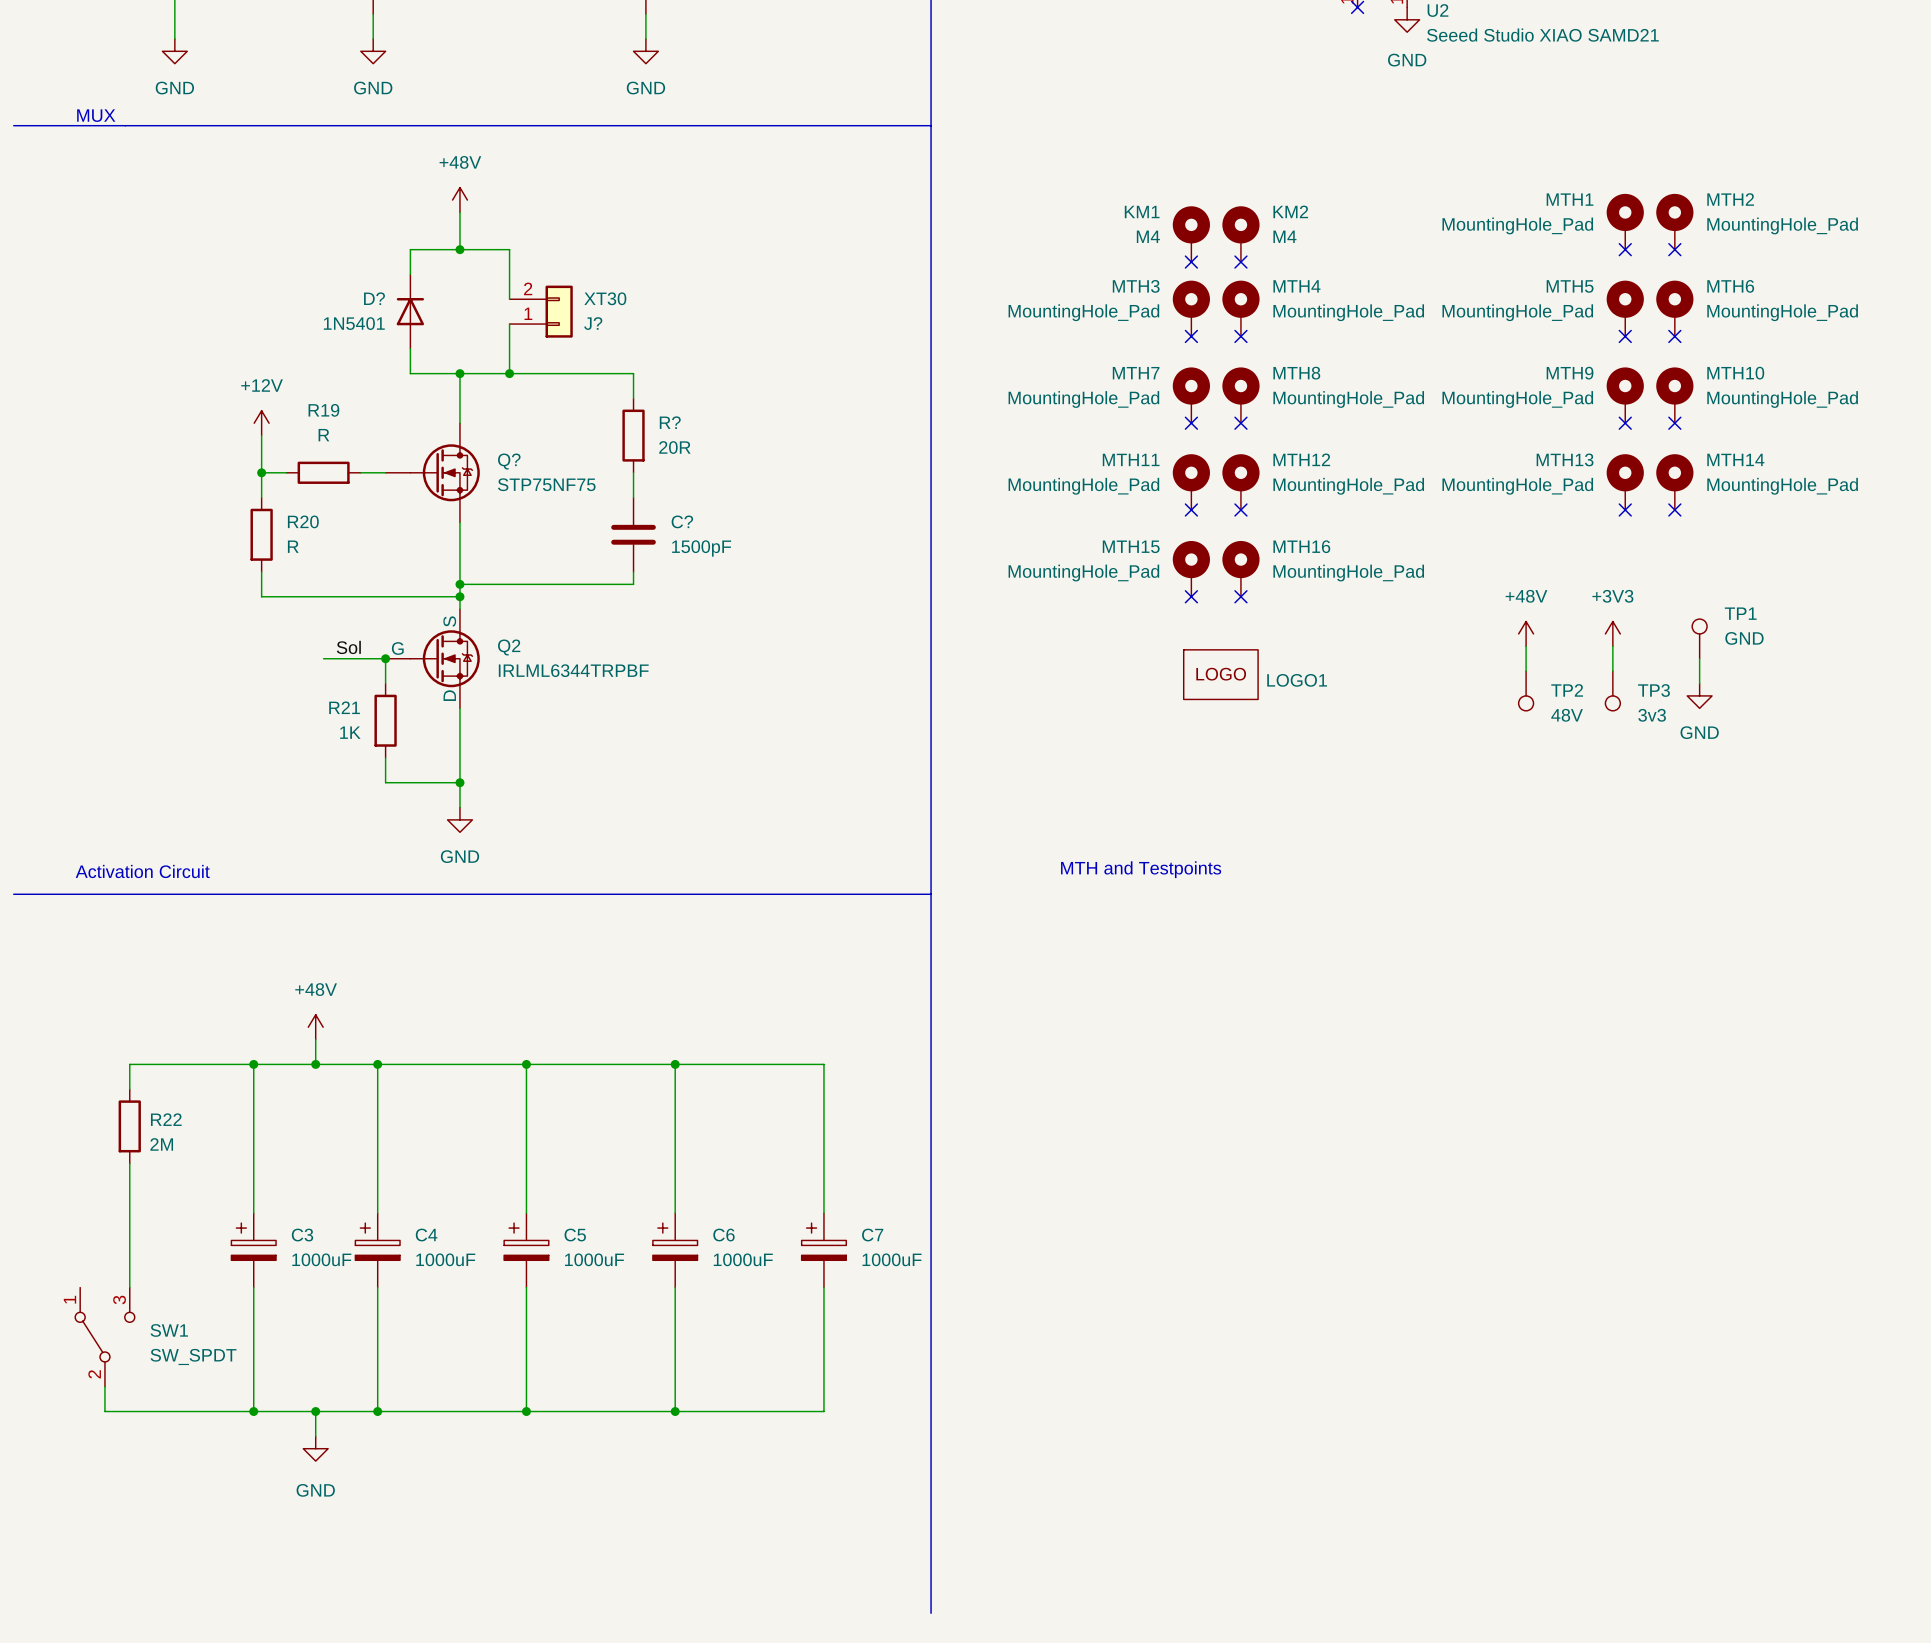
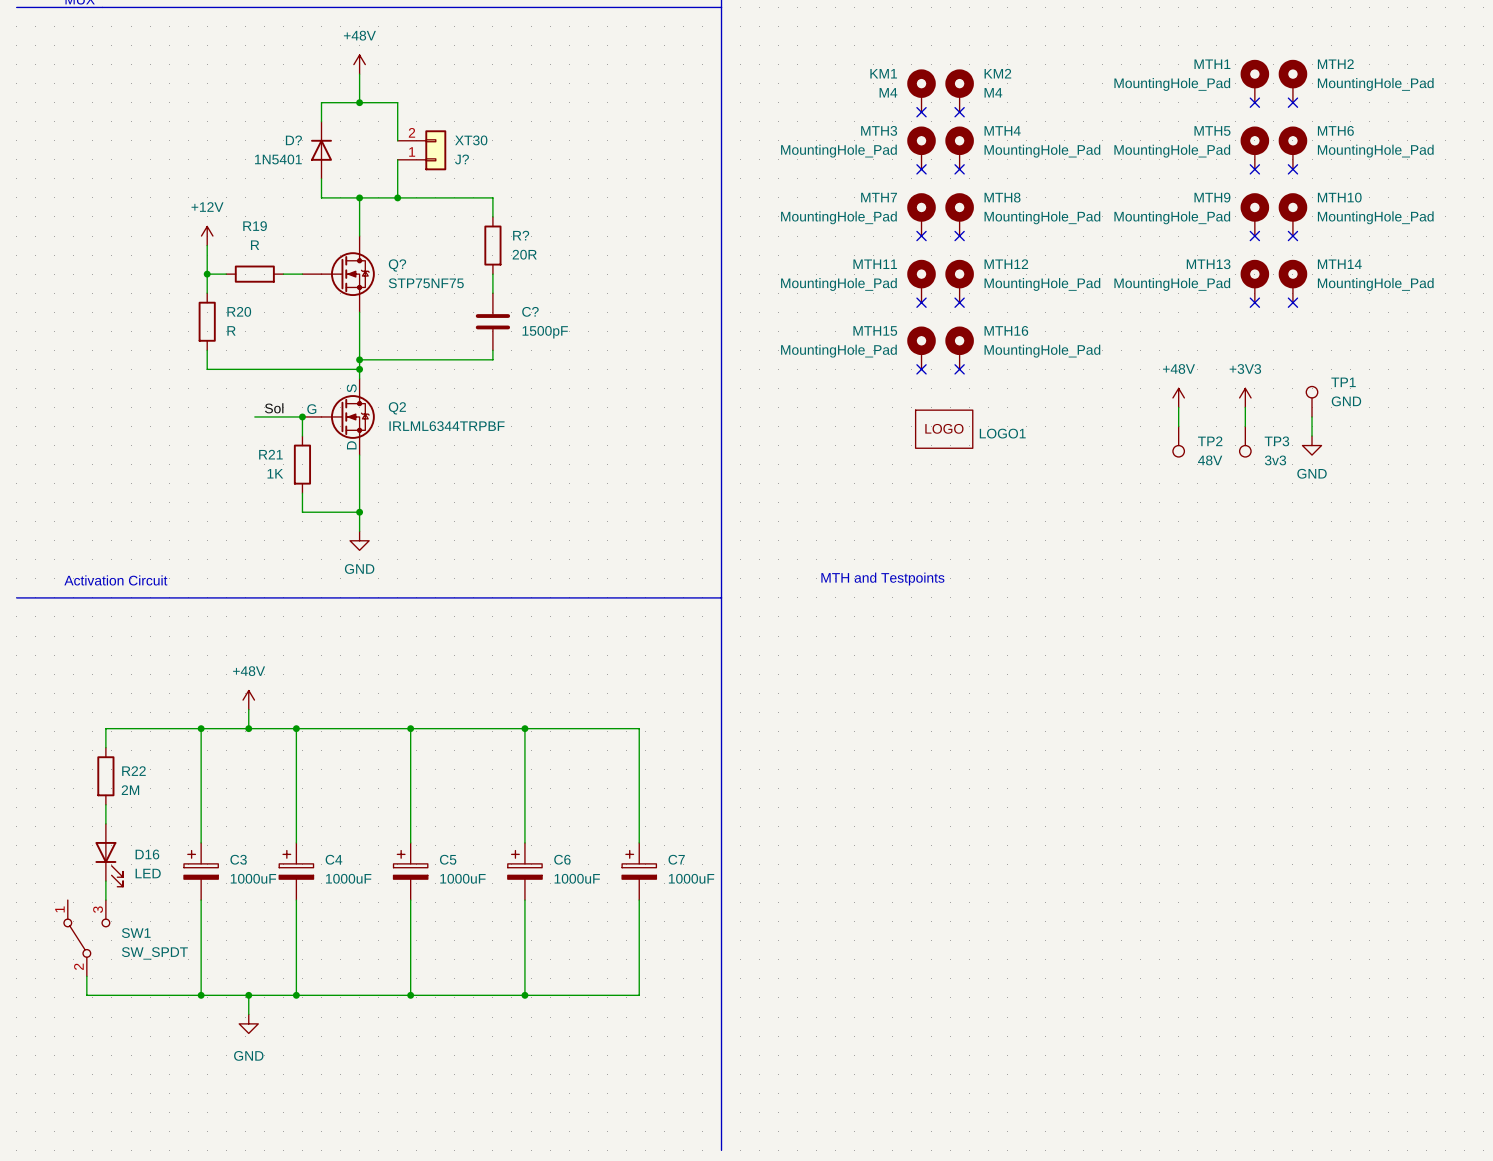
D16: none -> LED (109, 855)

